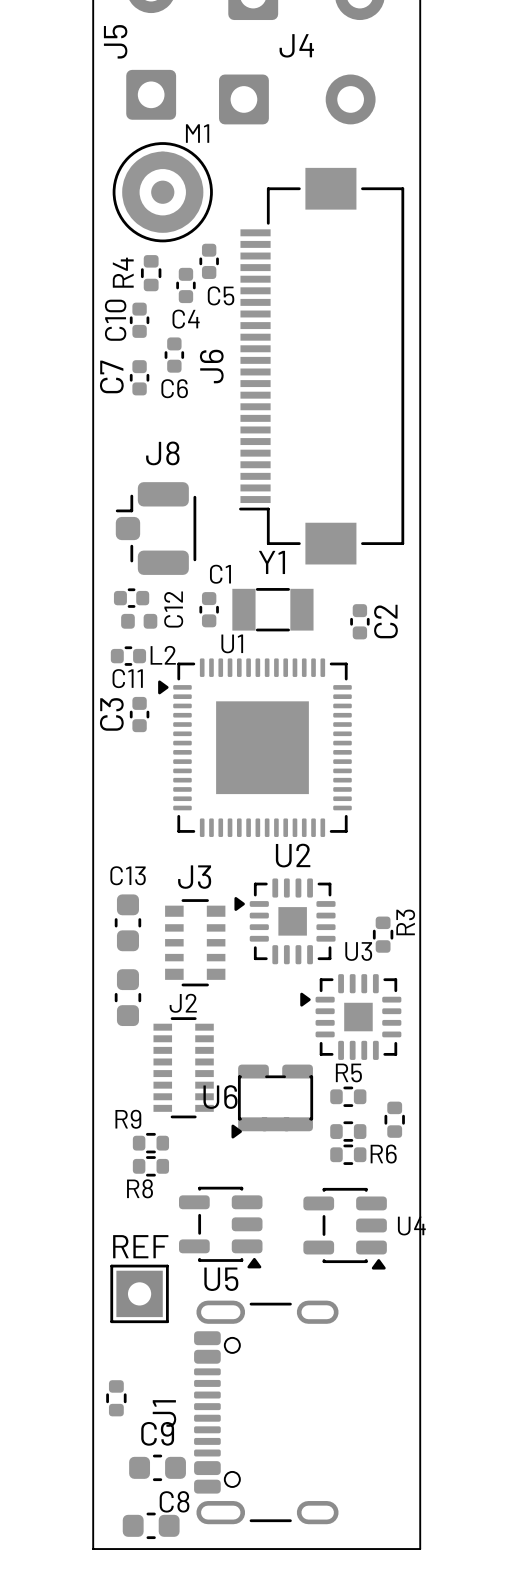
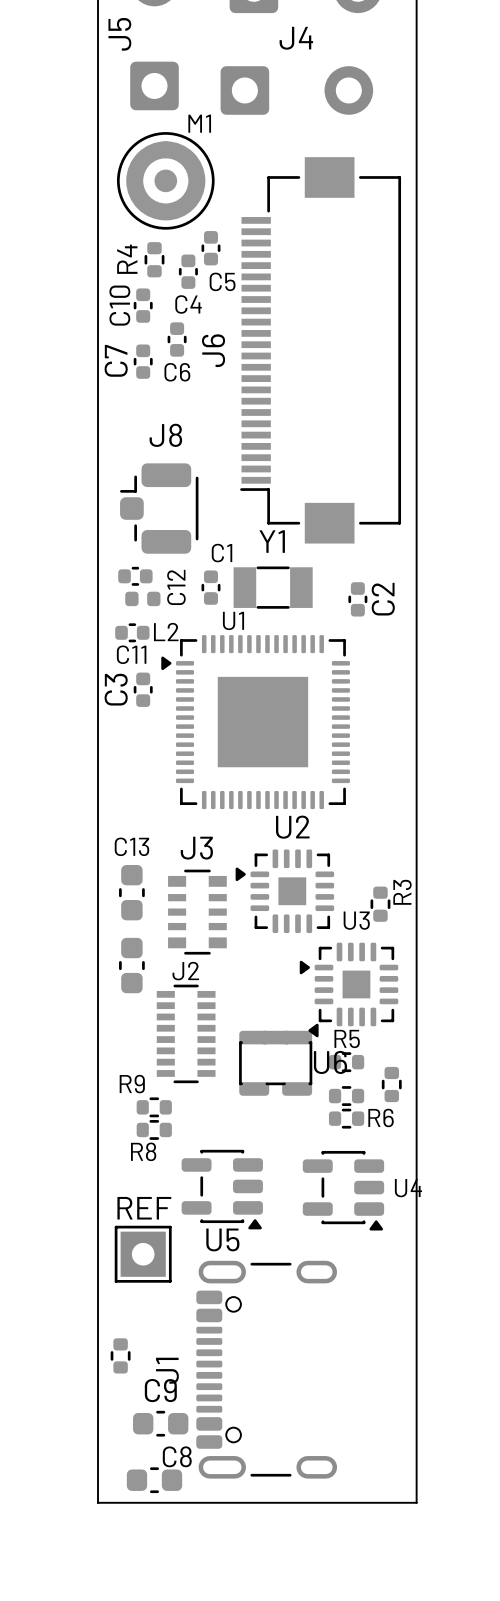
U6 rotation: 0° (272, 1101) -> 180° (278, 1059)

